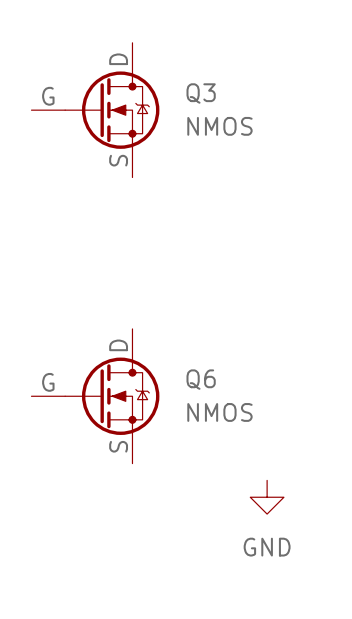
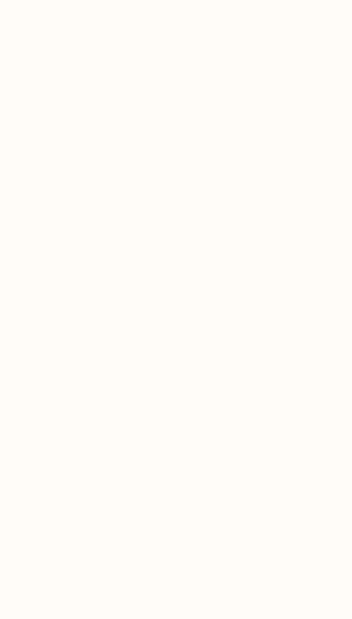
Q3: NMOS (95, 110) -> none
Q6: NMOS (95, 396) -> none
power symbol: GND (267, 497) -> none

